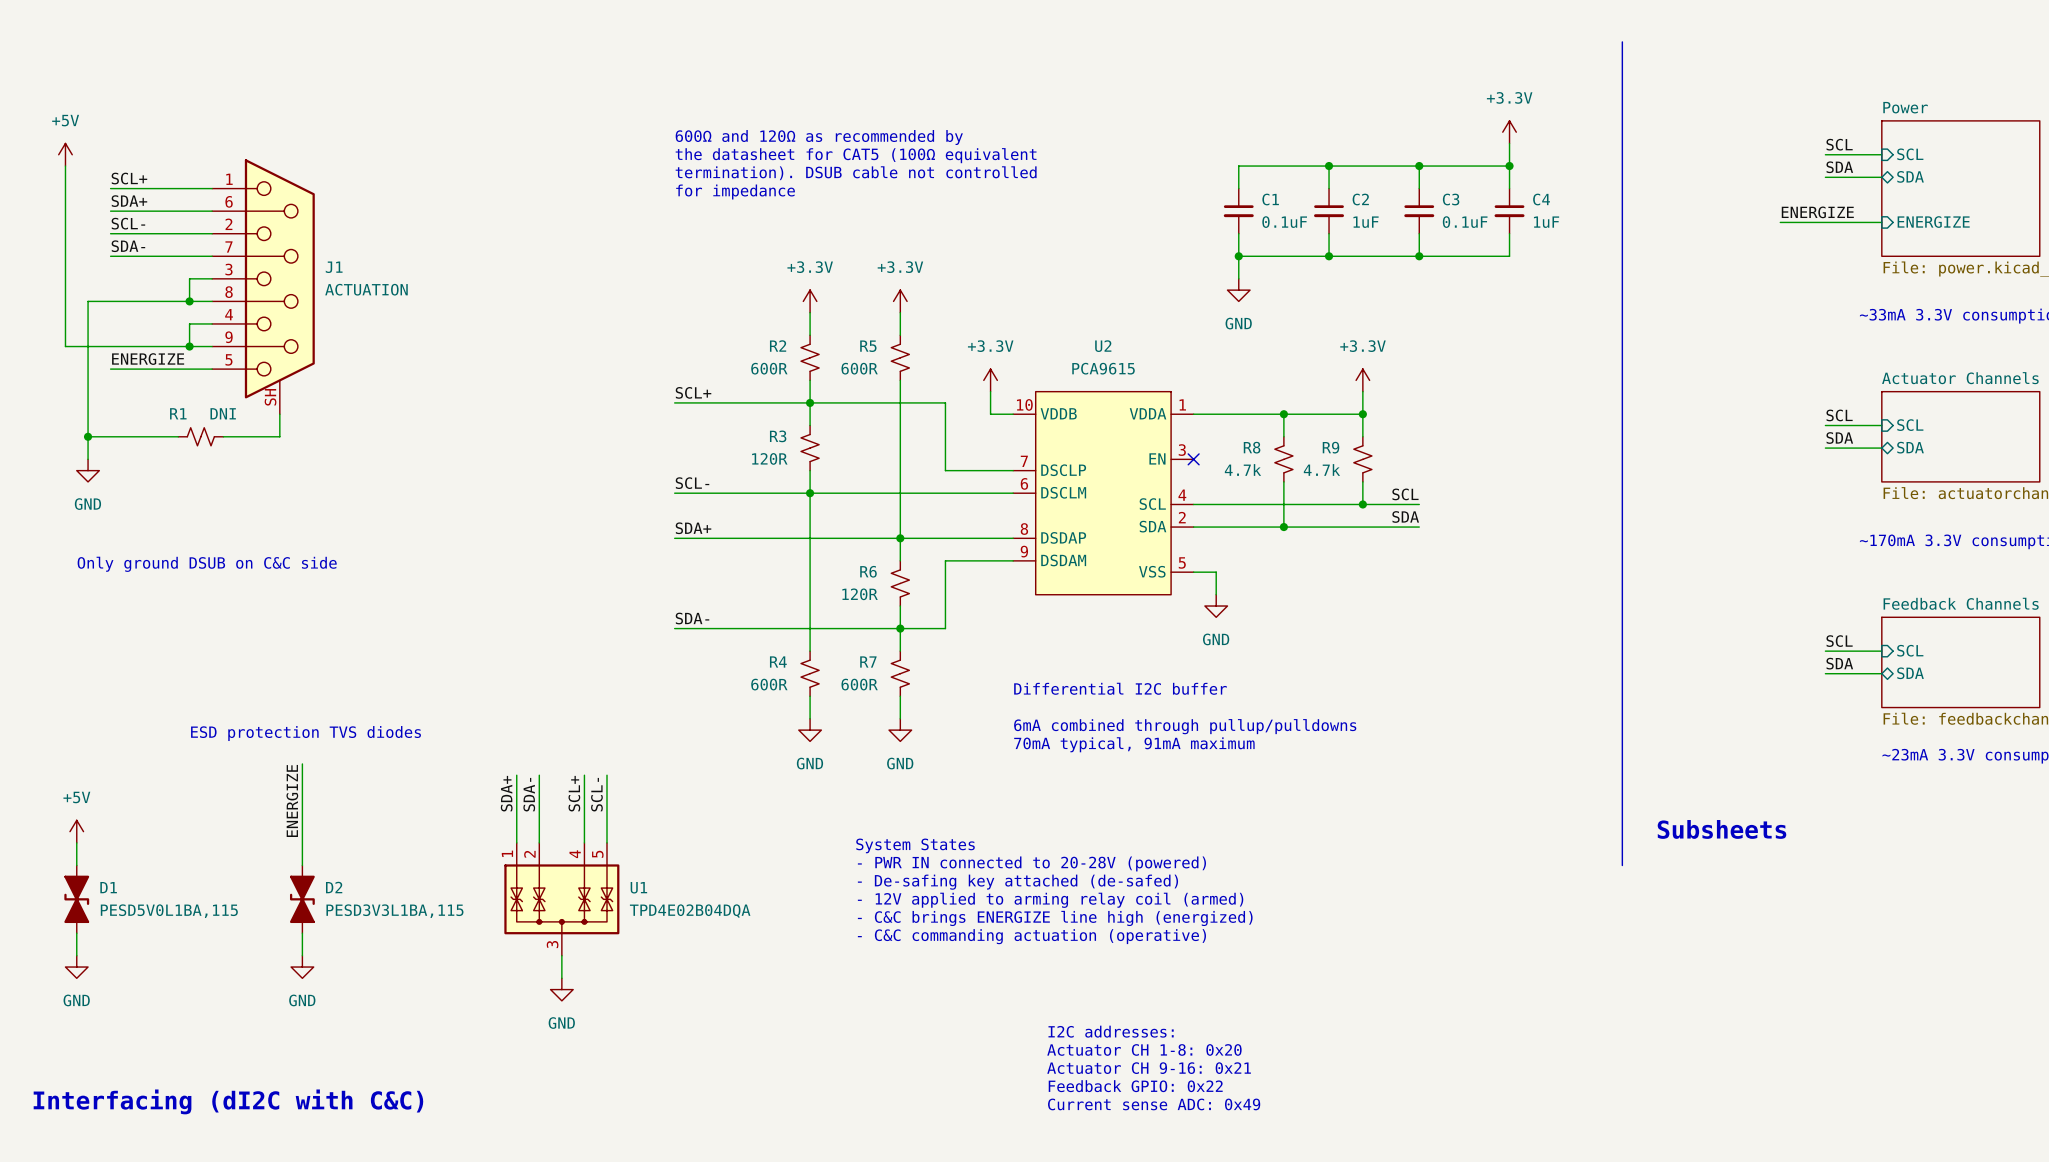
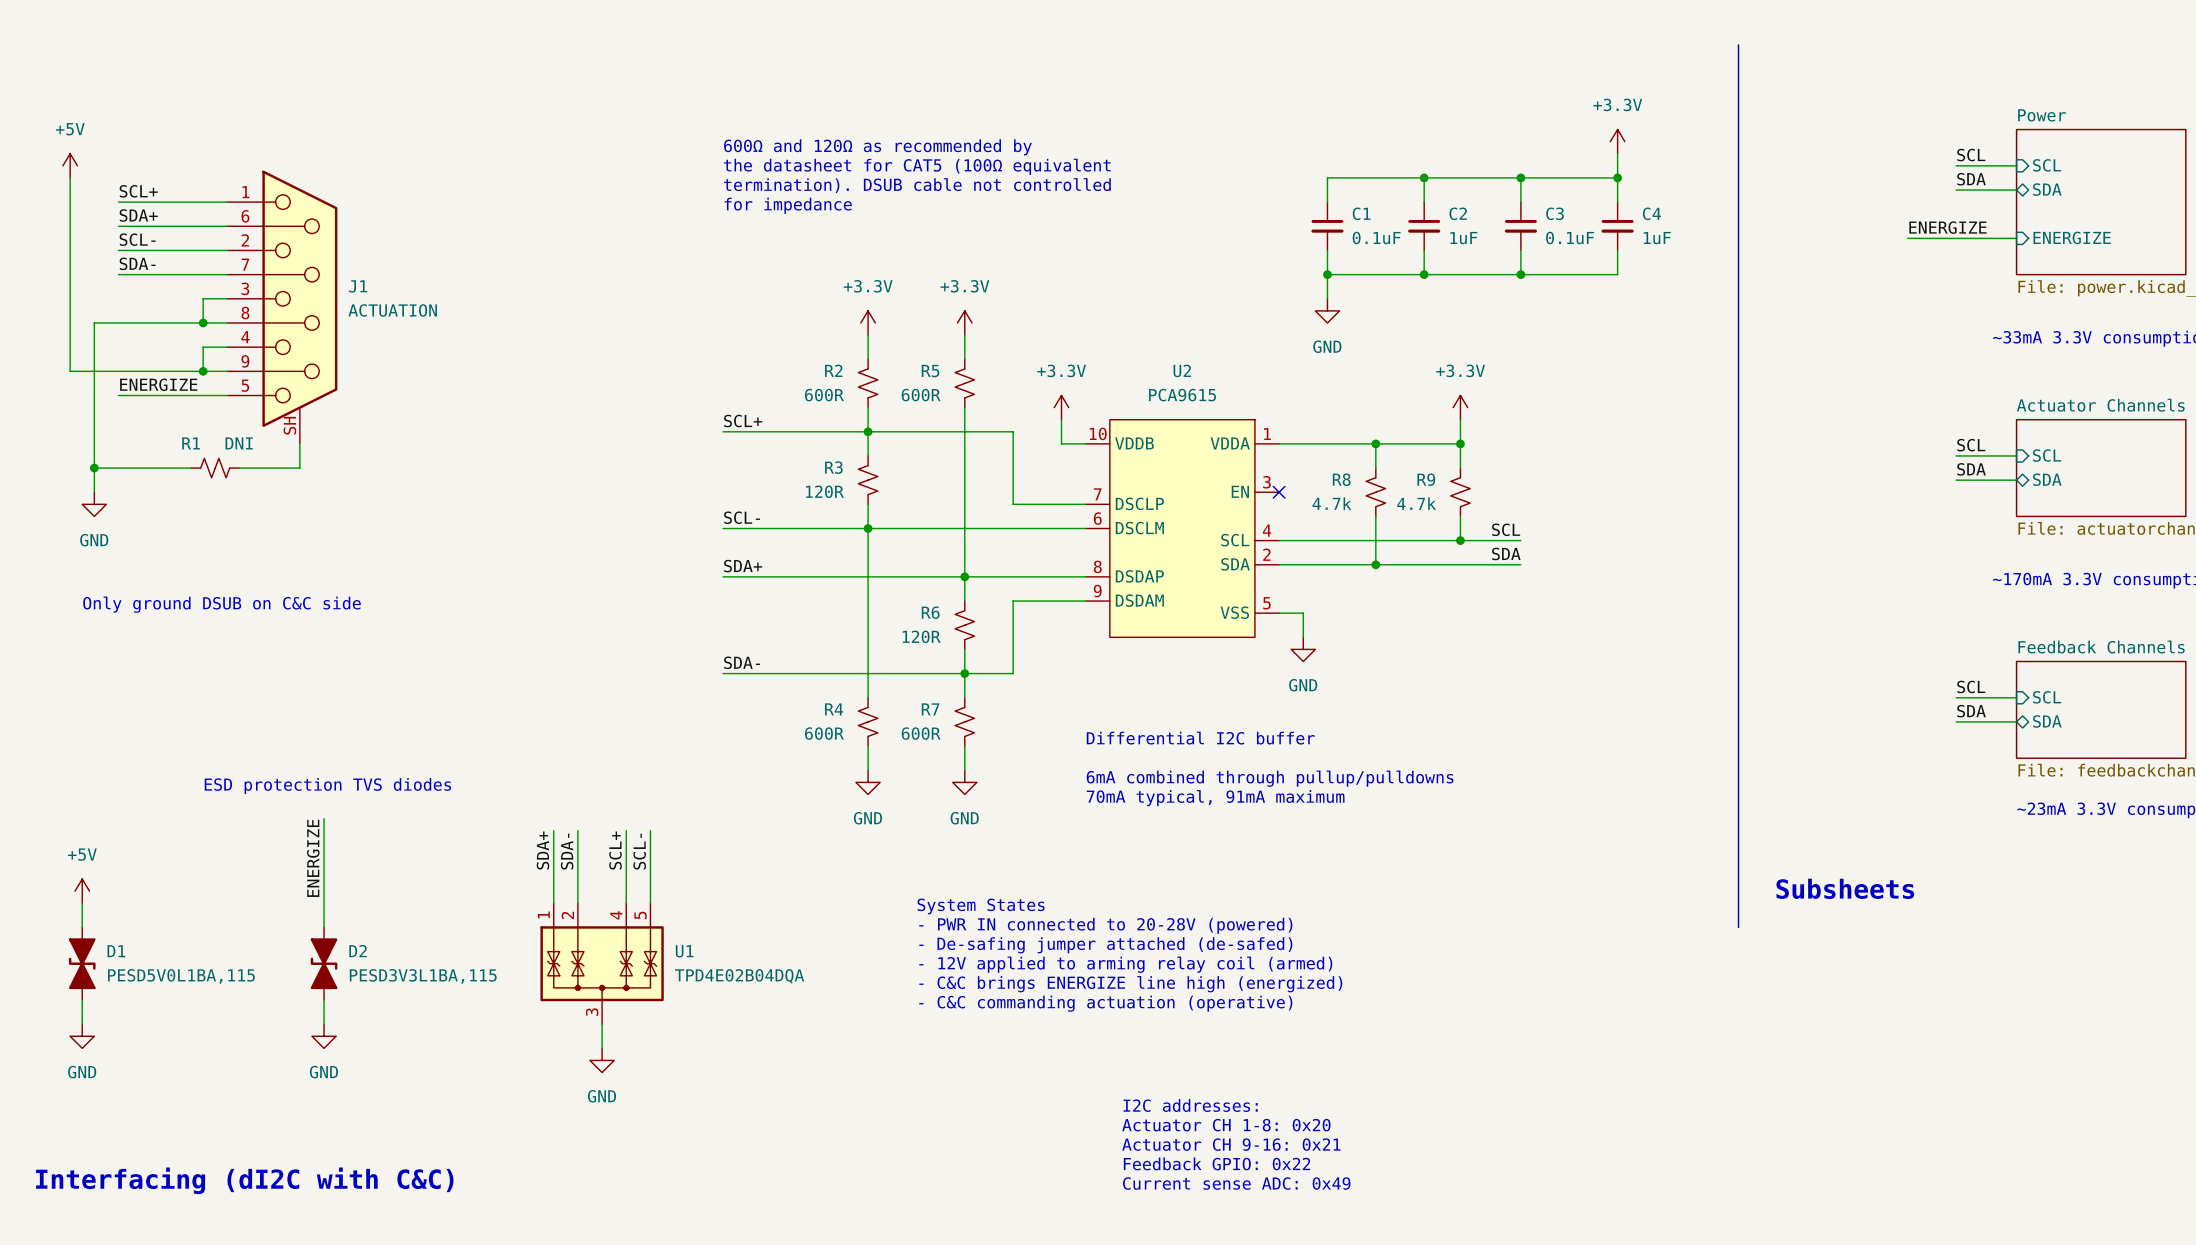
text: - De-safing key attached (de-safed) (1017, 882) -> - De-safing jumper attached (de-safed) (1105, 945)

